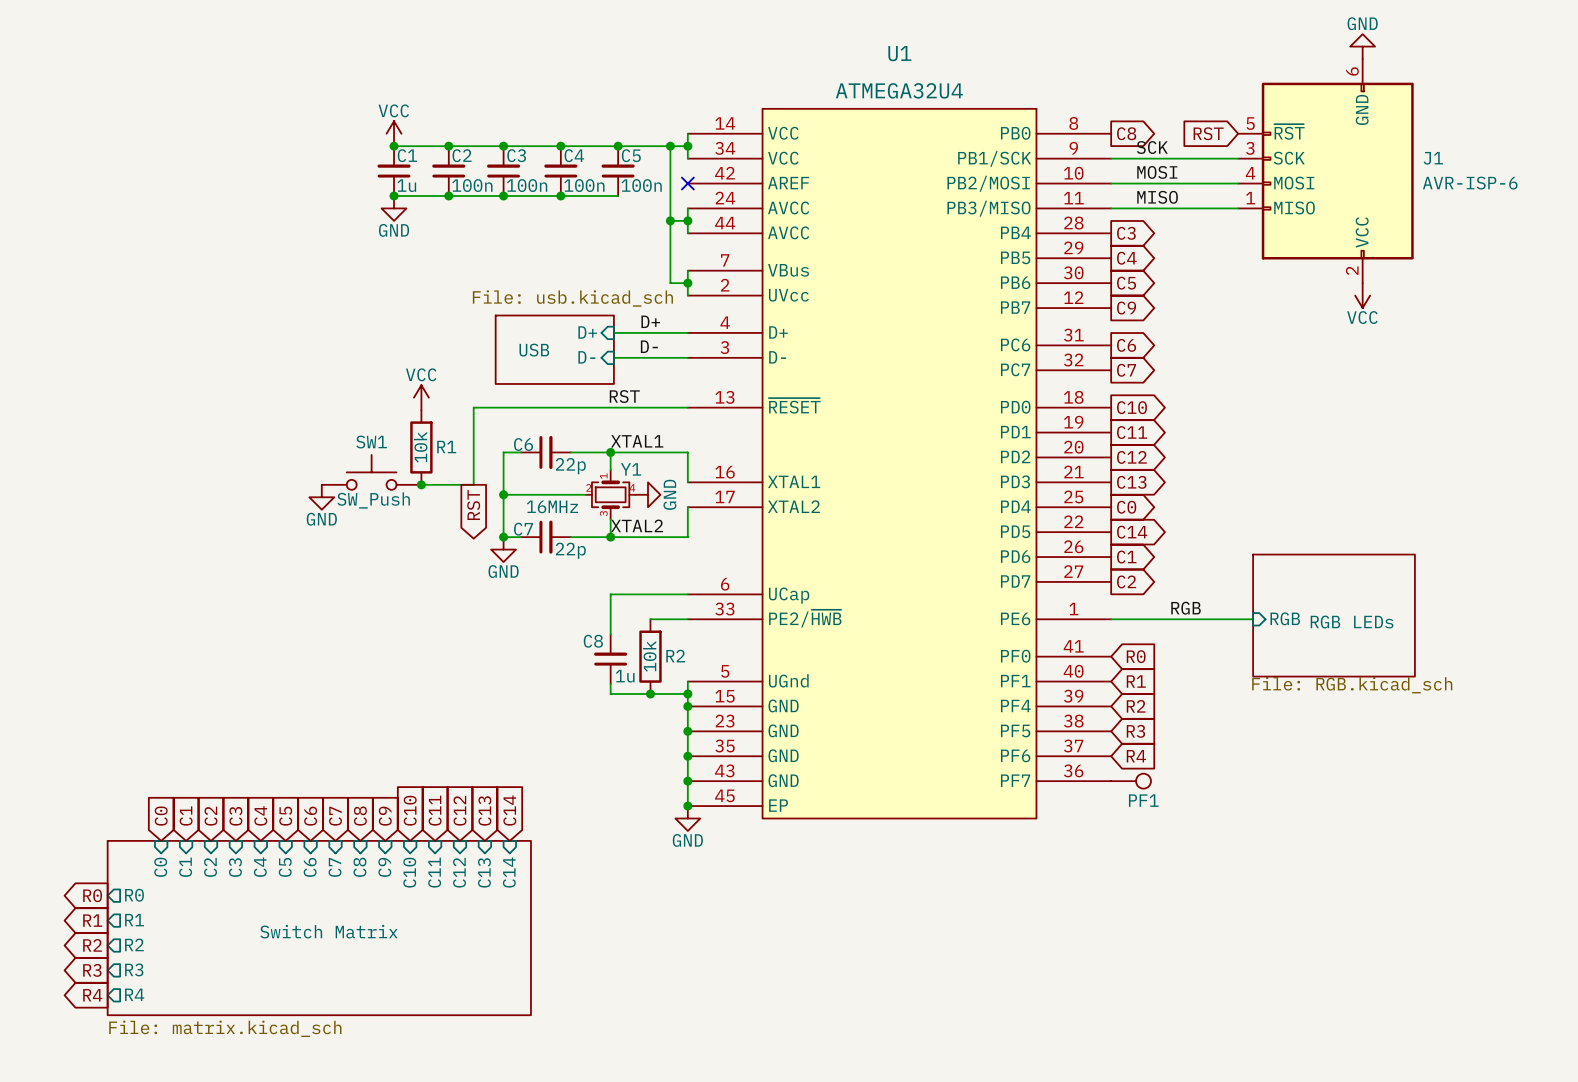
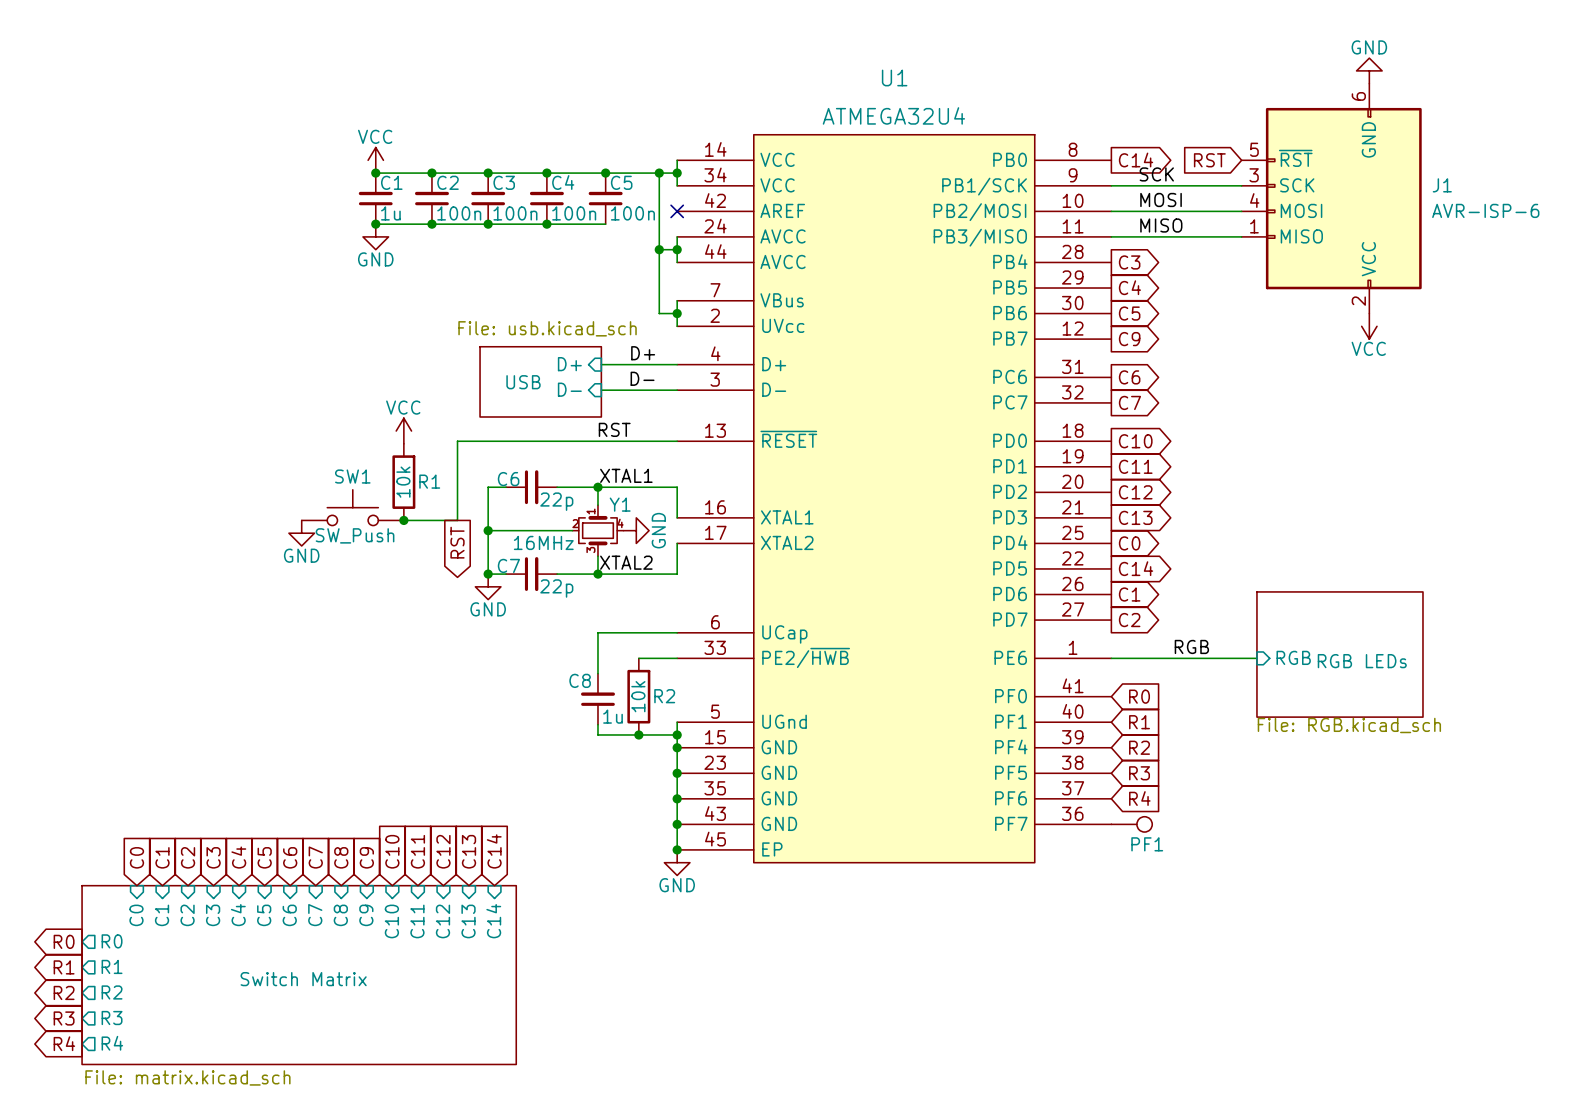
global label: C8 (1126, 133) -> C14 (1136, 159)

